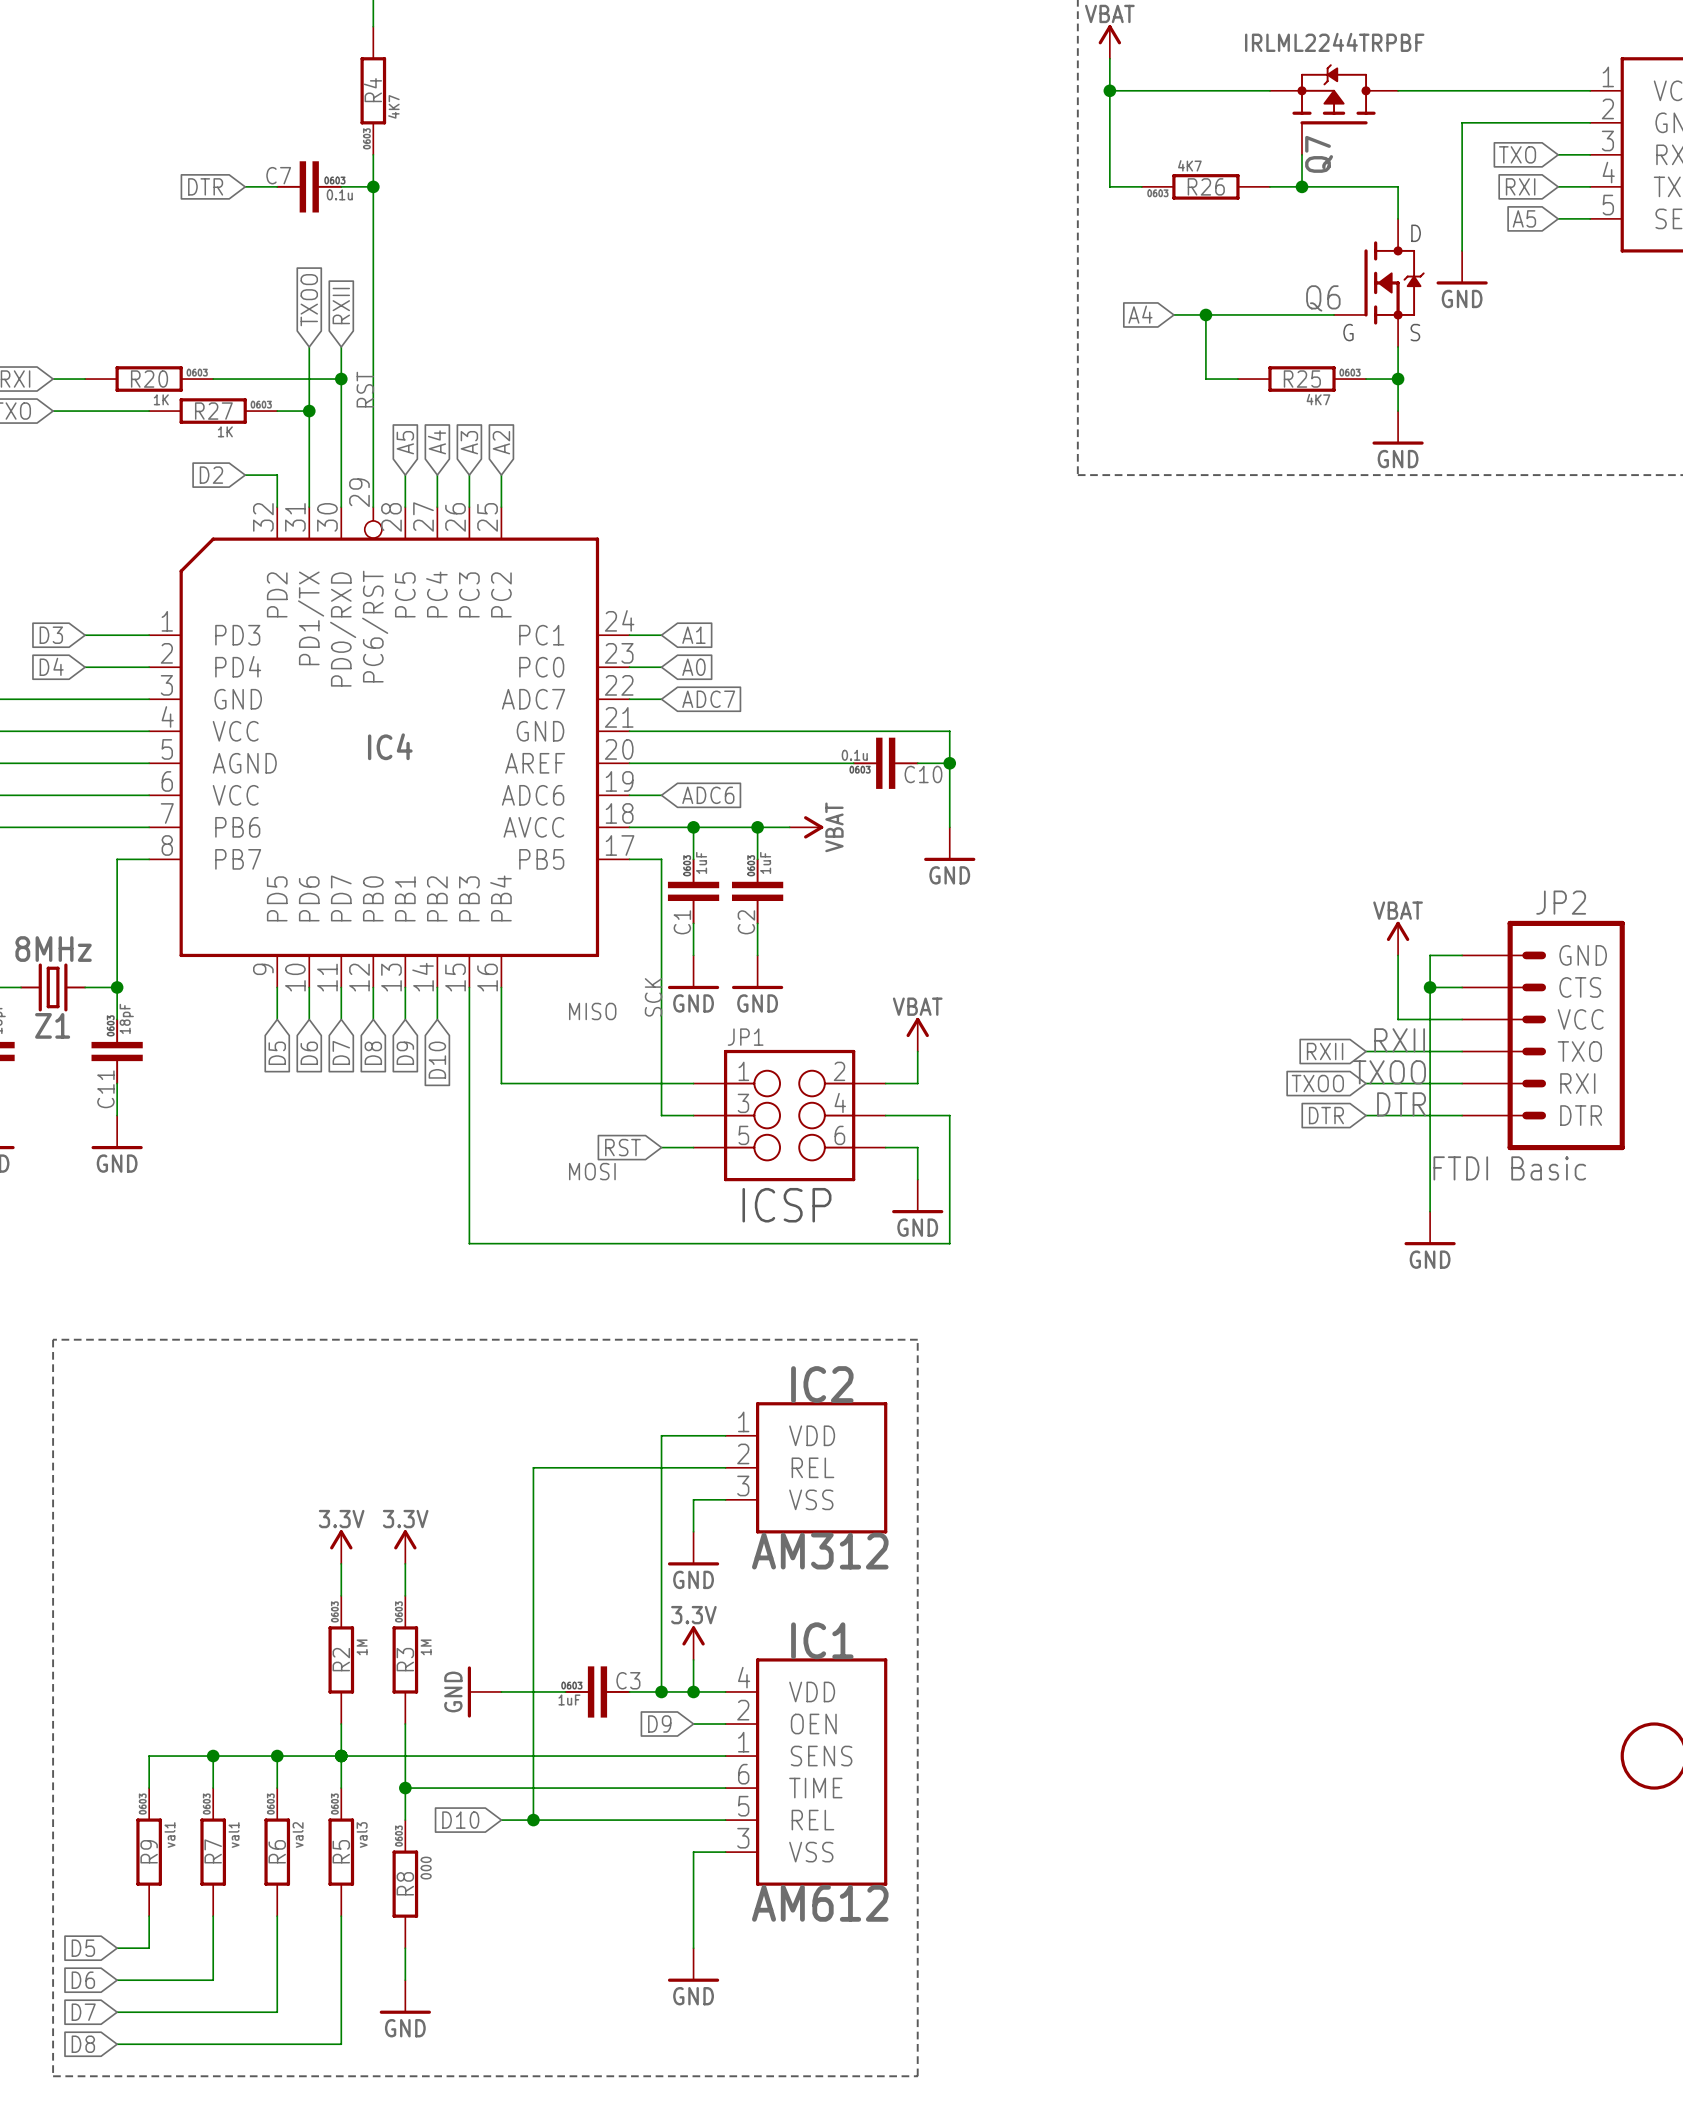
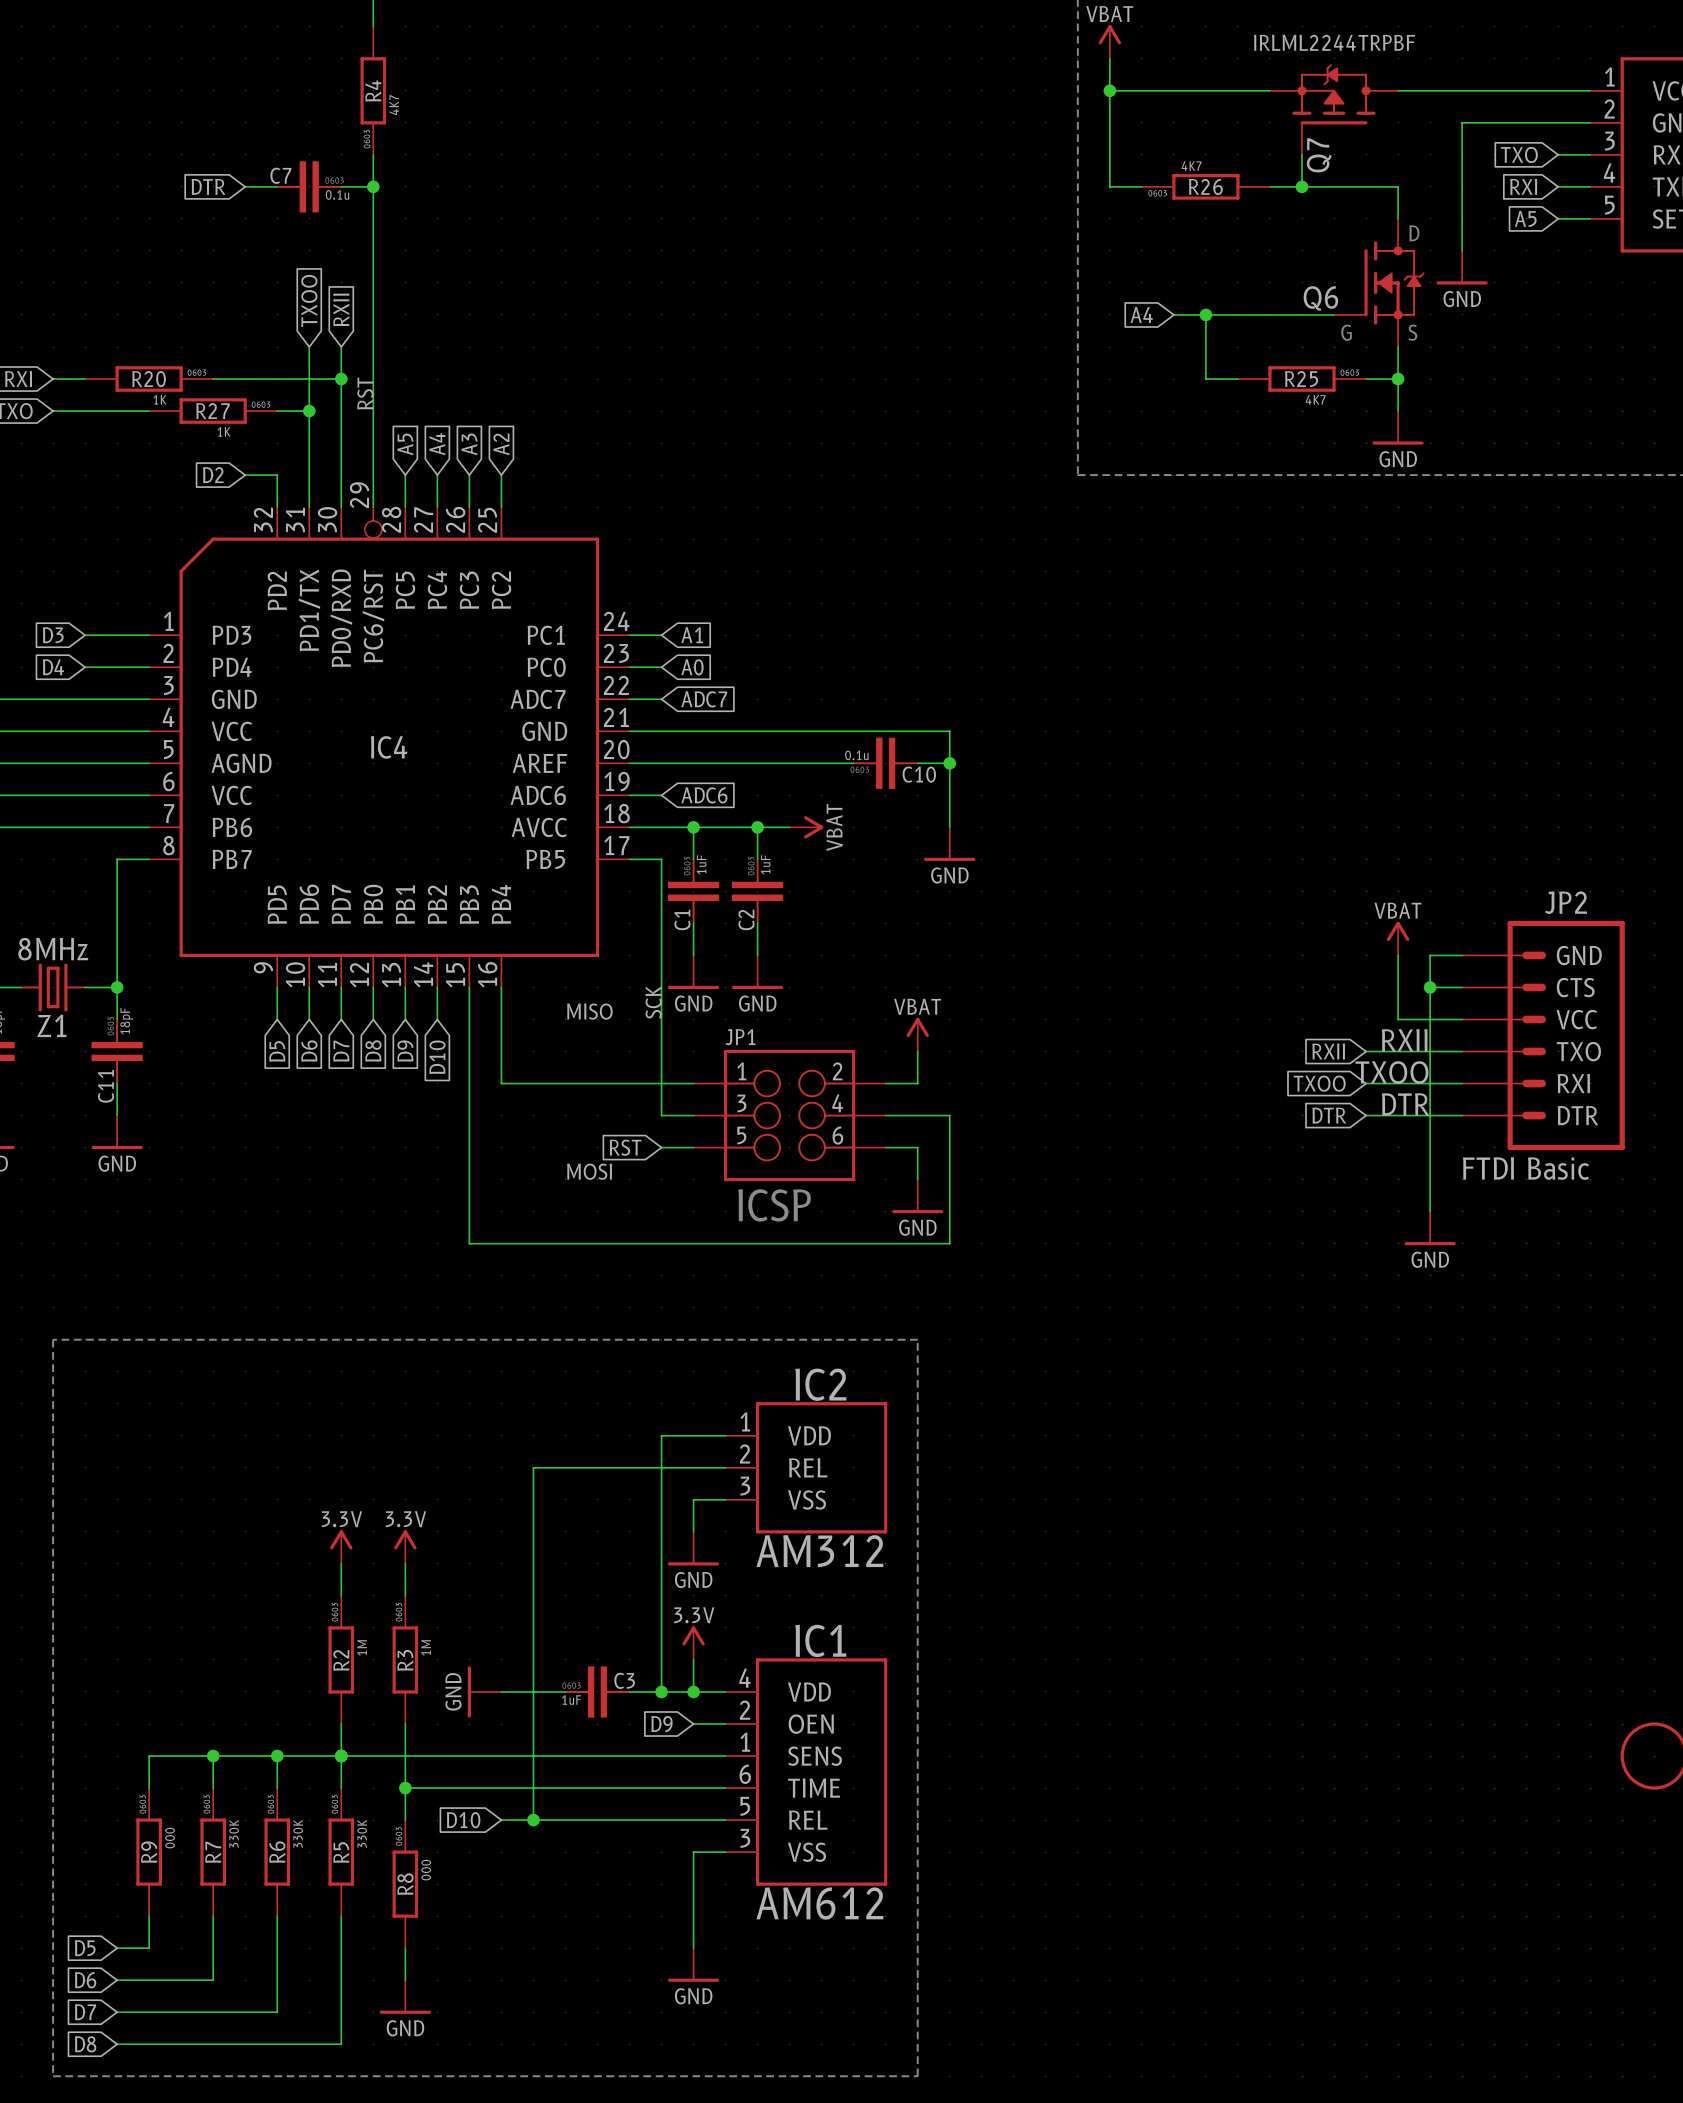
R9 value: val1 (169, 1835) -> 000 (170, 1838)
R7 value: val1 (234, 1835) -> 330K (234, 1833)
R6 value: val2 (298, 1835) -> 330K (298, 1833)
R5 value: val3 (362, 1835) -> 330K (362, 1833)

